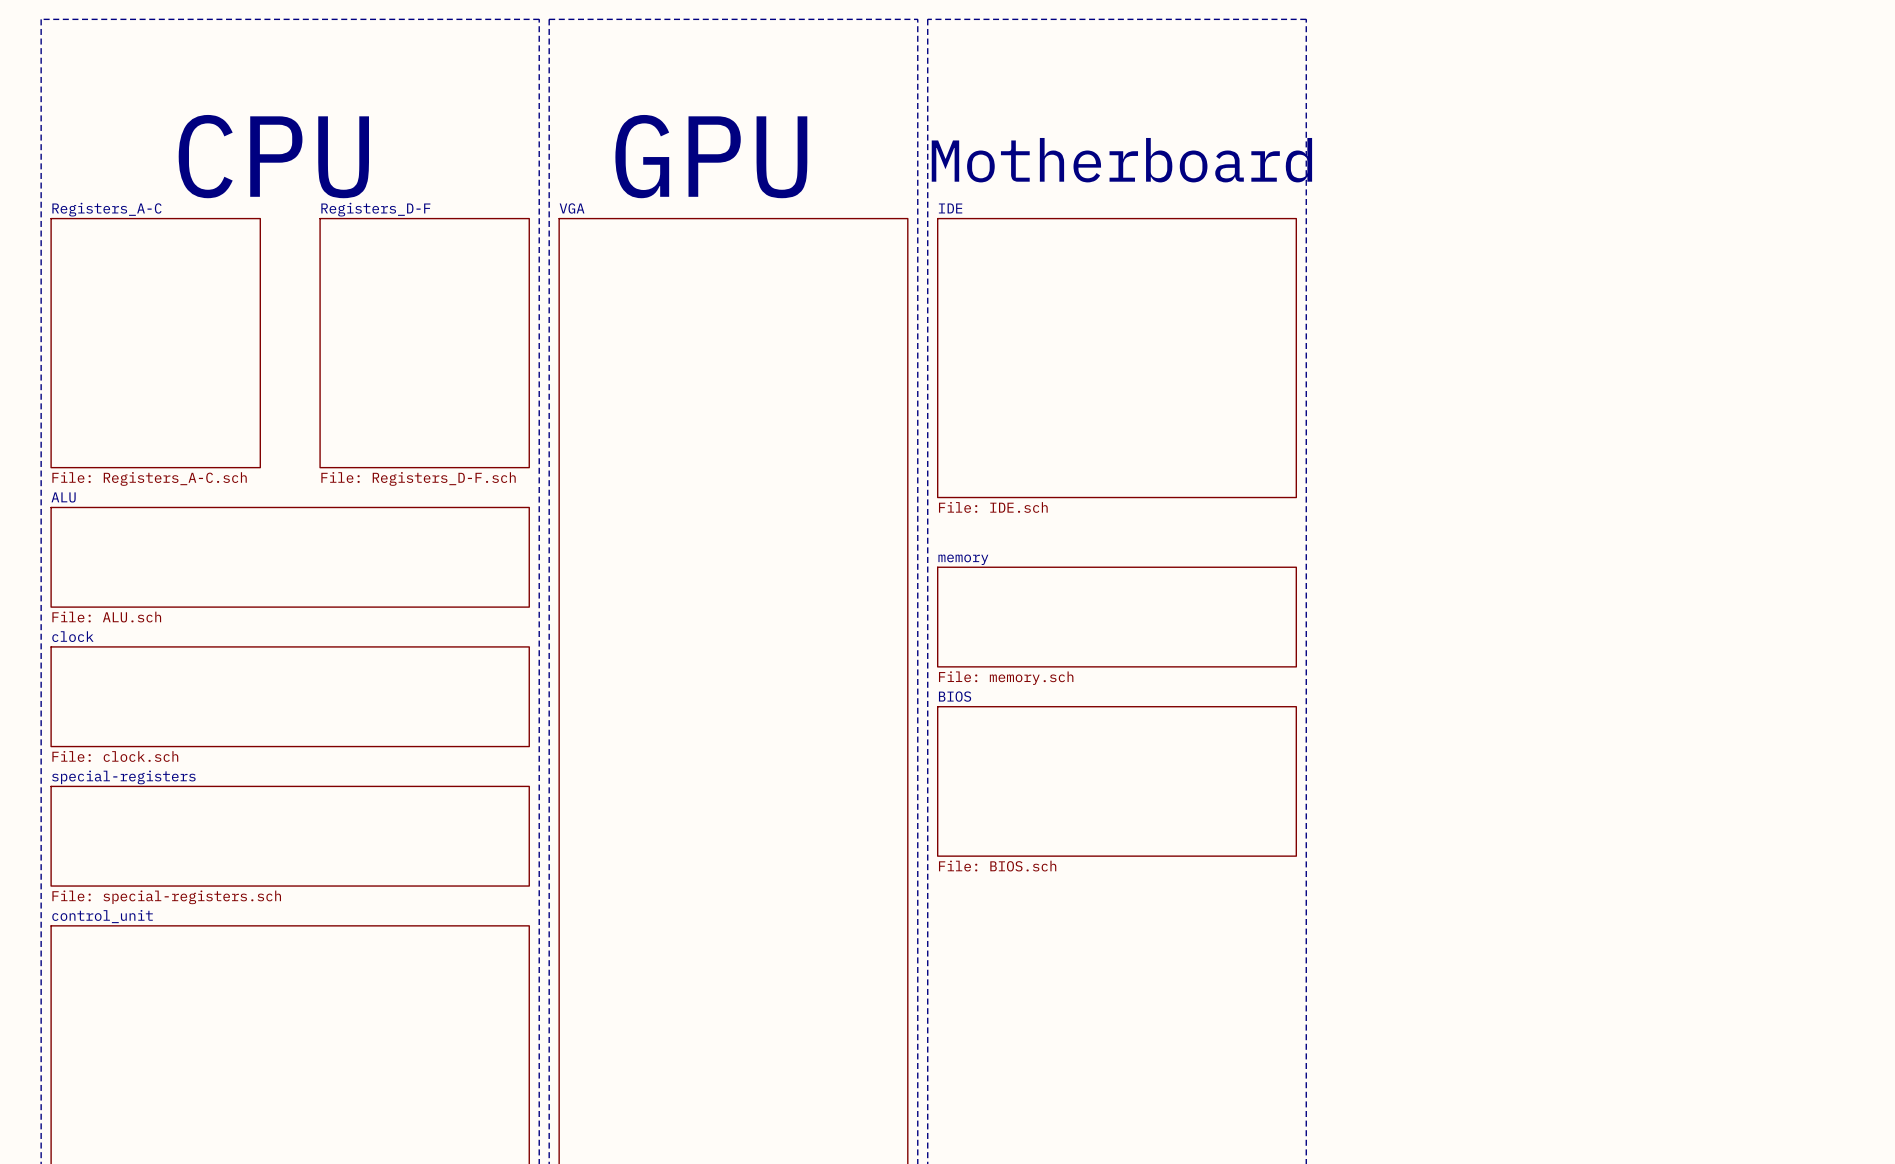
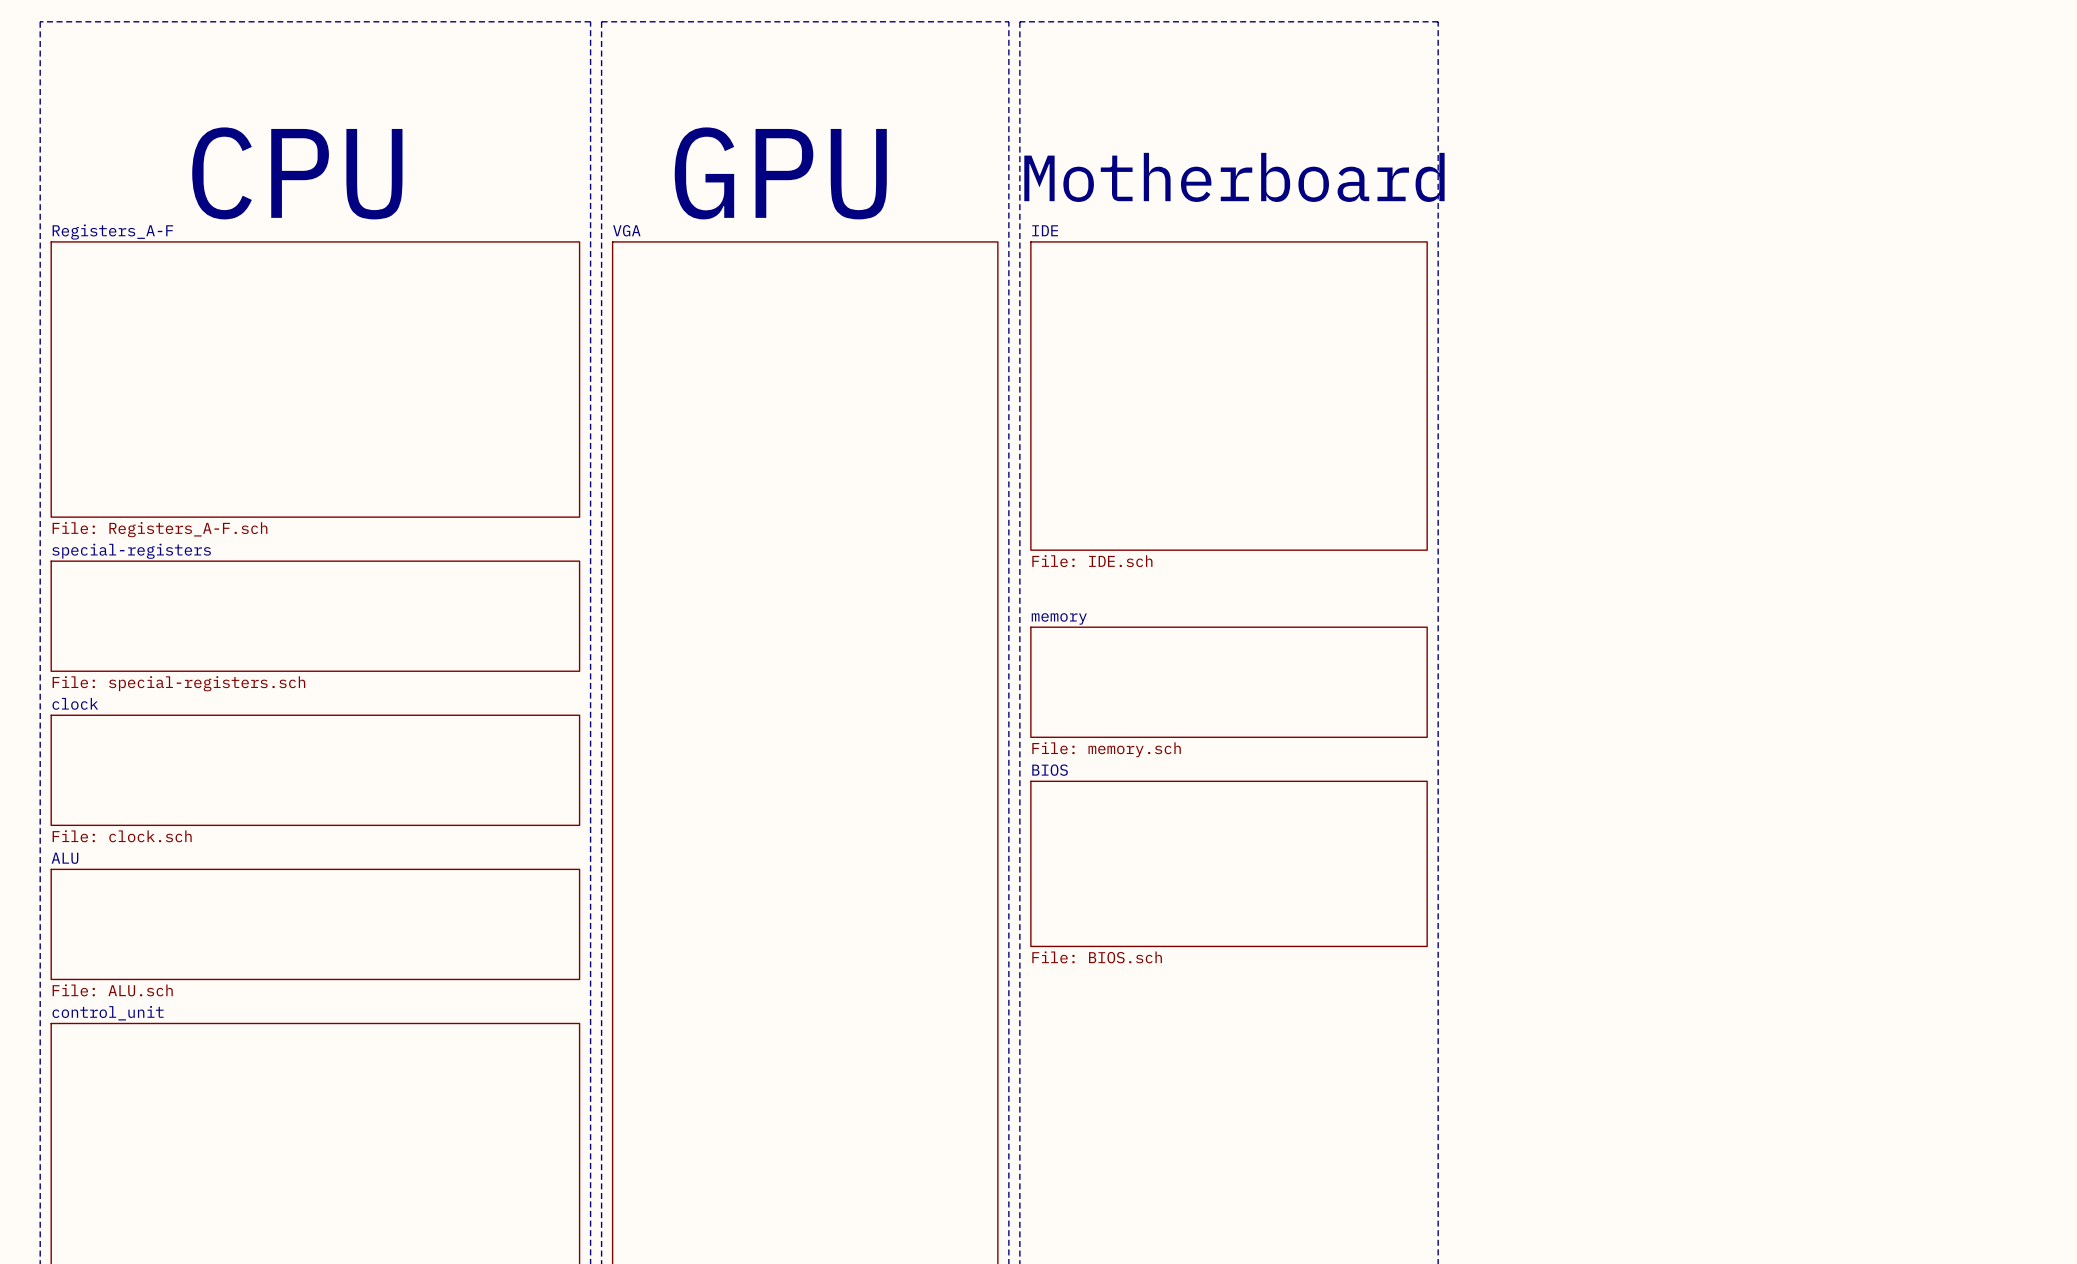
sheet Registers_A-C: File: Registers_A-C.sch (155, 343) -> none
sheet Registers_A-F: none -> File: Registers_A-F.sch (315, 379)
sheet Registers_D-F: File: Registers_D-F.sch (424, 343) -> none
sheet ALU name: ALU (63, 497) -> special-registers (131, 551)
sheet ALU value: File: ALU.sch (106, 616) -> File: special-registers.sch (178, 683)
sheet special-registers name: special-registers (123, 777) -> ALU (65, 858)
sheet special-registers value: File: special-registers.sch (166, 897) -> File: ALU.sch (112, 990)

